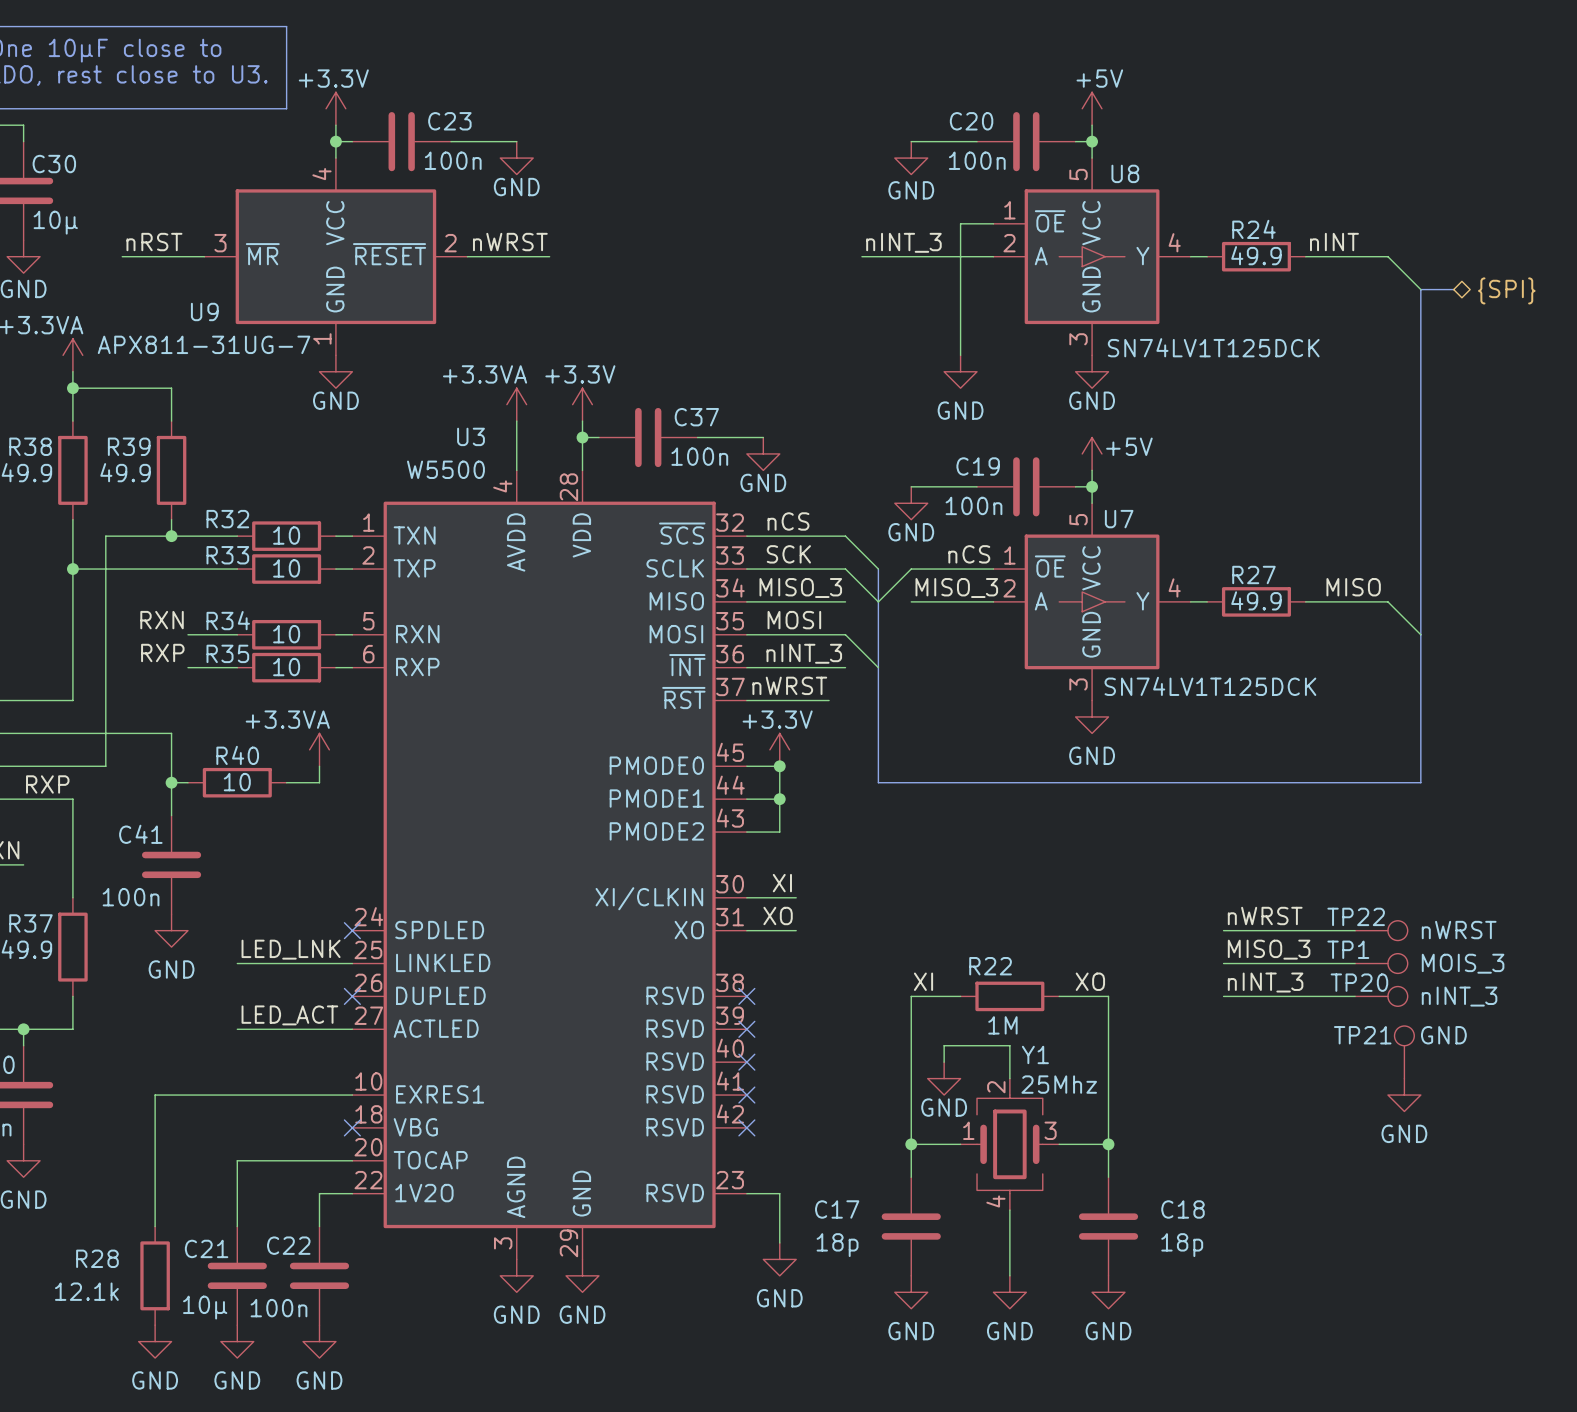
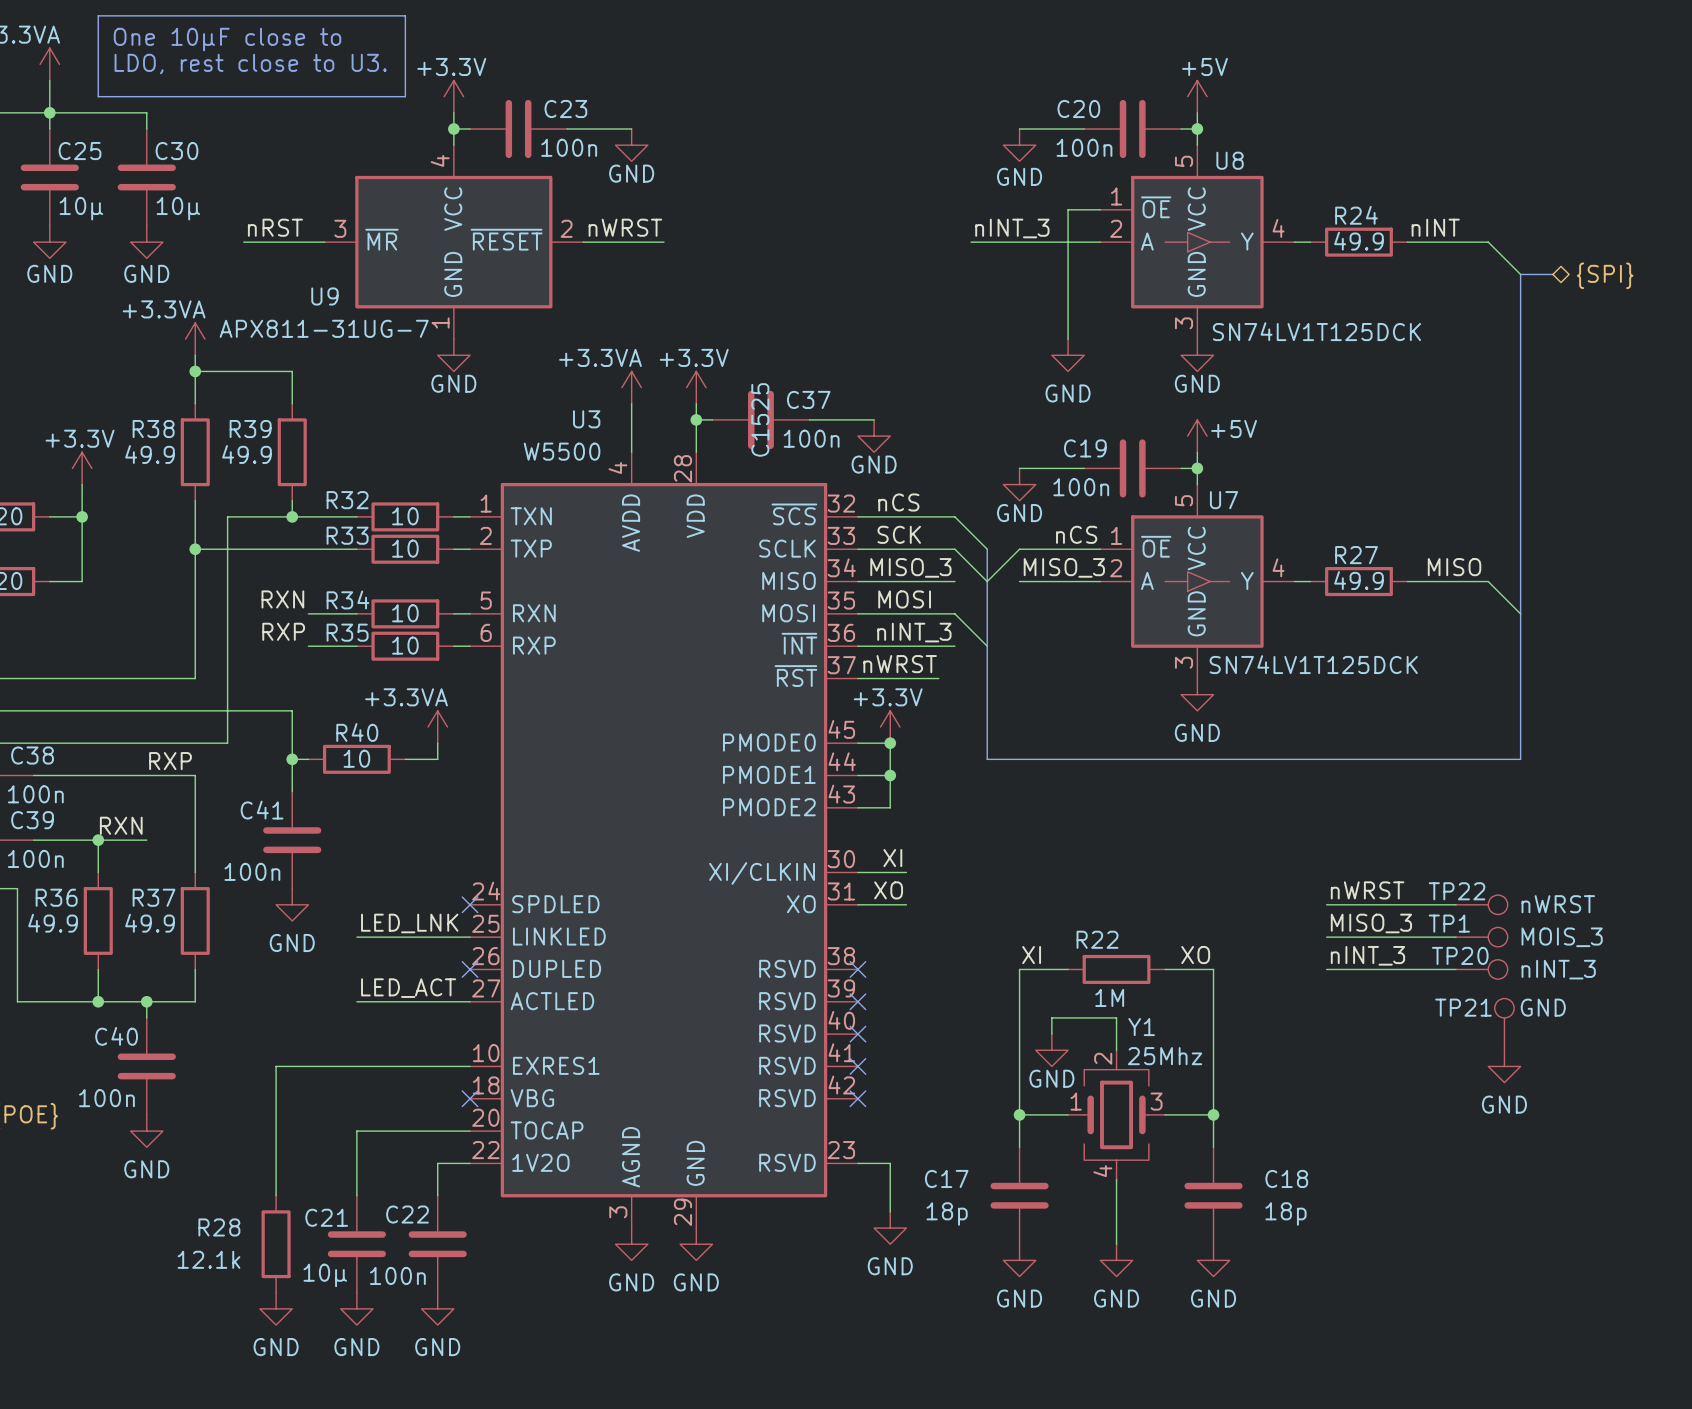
C37 text: none -> C1525 (760, 419)

